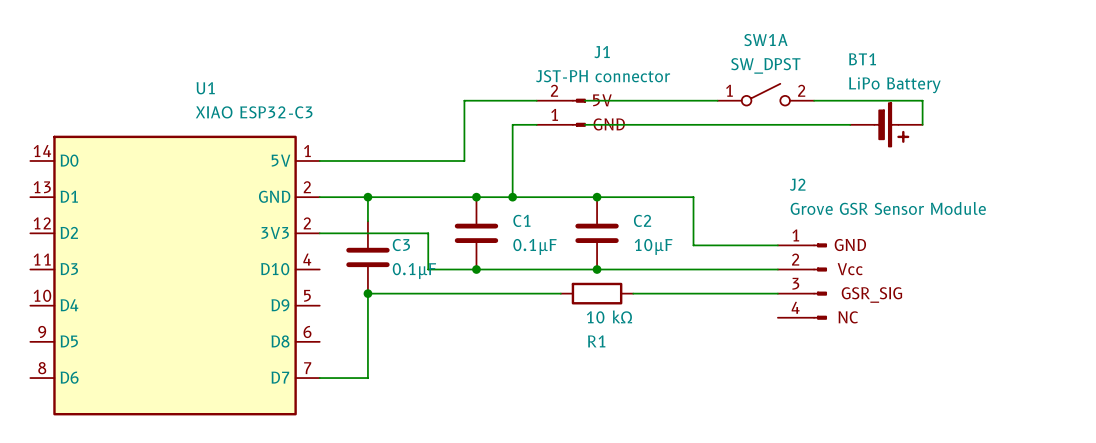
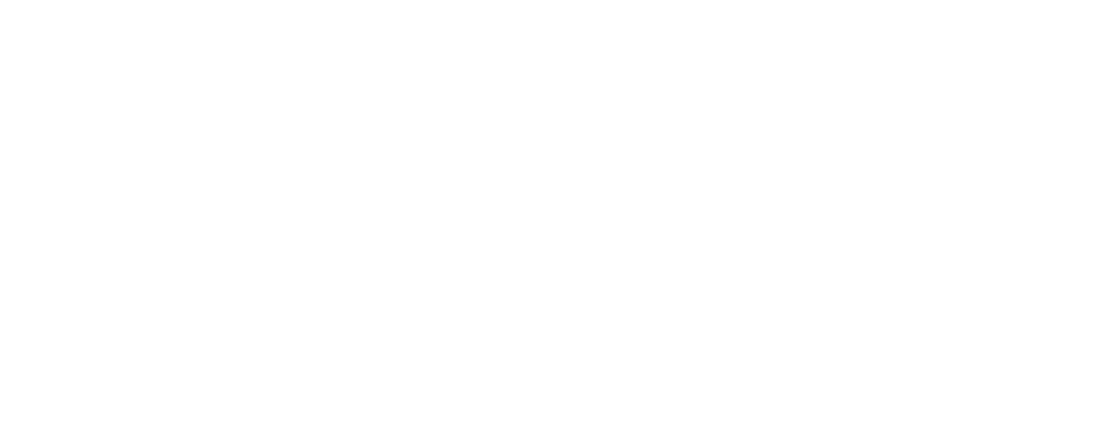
SW1A: SW_DPST (765, 94) -> none
wire: (536, 100) (464, 100) (464, 160) (319, 160) -> none
wire: (584, 100) (717, 100) -> none
wire: (814, 100) (922, 100) (922, 124) -> none
J1: JST-PH connector (561, 112) -> none
wire: (536, 124) (512, 124) (512, 197) -> none
wire: (584, 124) (850, 124) -> none
BT1: LiPo Battery (886, 124) -> none
wire: (319, 197) (693, 197) (693, 245) (777, 245) -> none
wire: (367, 197) (367, 221) -> none
junction: (367, 197) -> none
junction: (476, 197) -> none
junction: (512, 197) -> none
junction: (597, 197) -> none
wire: (319, 233) (428, 233) (428, 269) (777, 269) -> none
C1: 0.1µF (476, 233) -> none
C2: 10µF (597, 233) -> none
C3: 0.1µF (367, 257) -> none
junction: (476, 269) -> none
junction: (597, 269) -> none
U1: XIAO ESP32-C3 (175, 275) -> none
J2: Grove GSR Sensor Module (802, 281) -> none
junction: (367, 293) -> none
wire: (560, 293) (367, 293) (367, 378) (319, 378) -> none
R1: 10 kΩ (597, 293) -> none
wire: (633, 293) (777, 293) -> none

